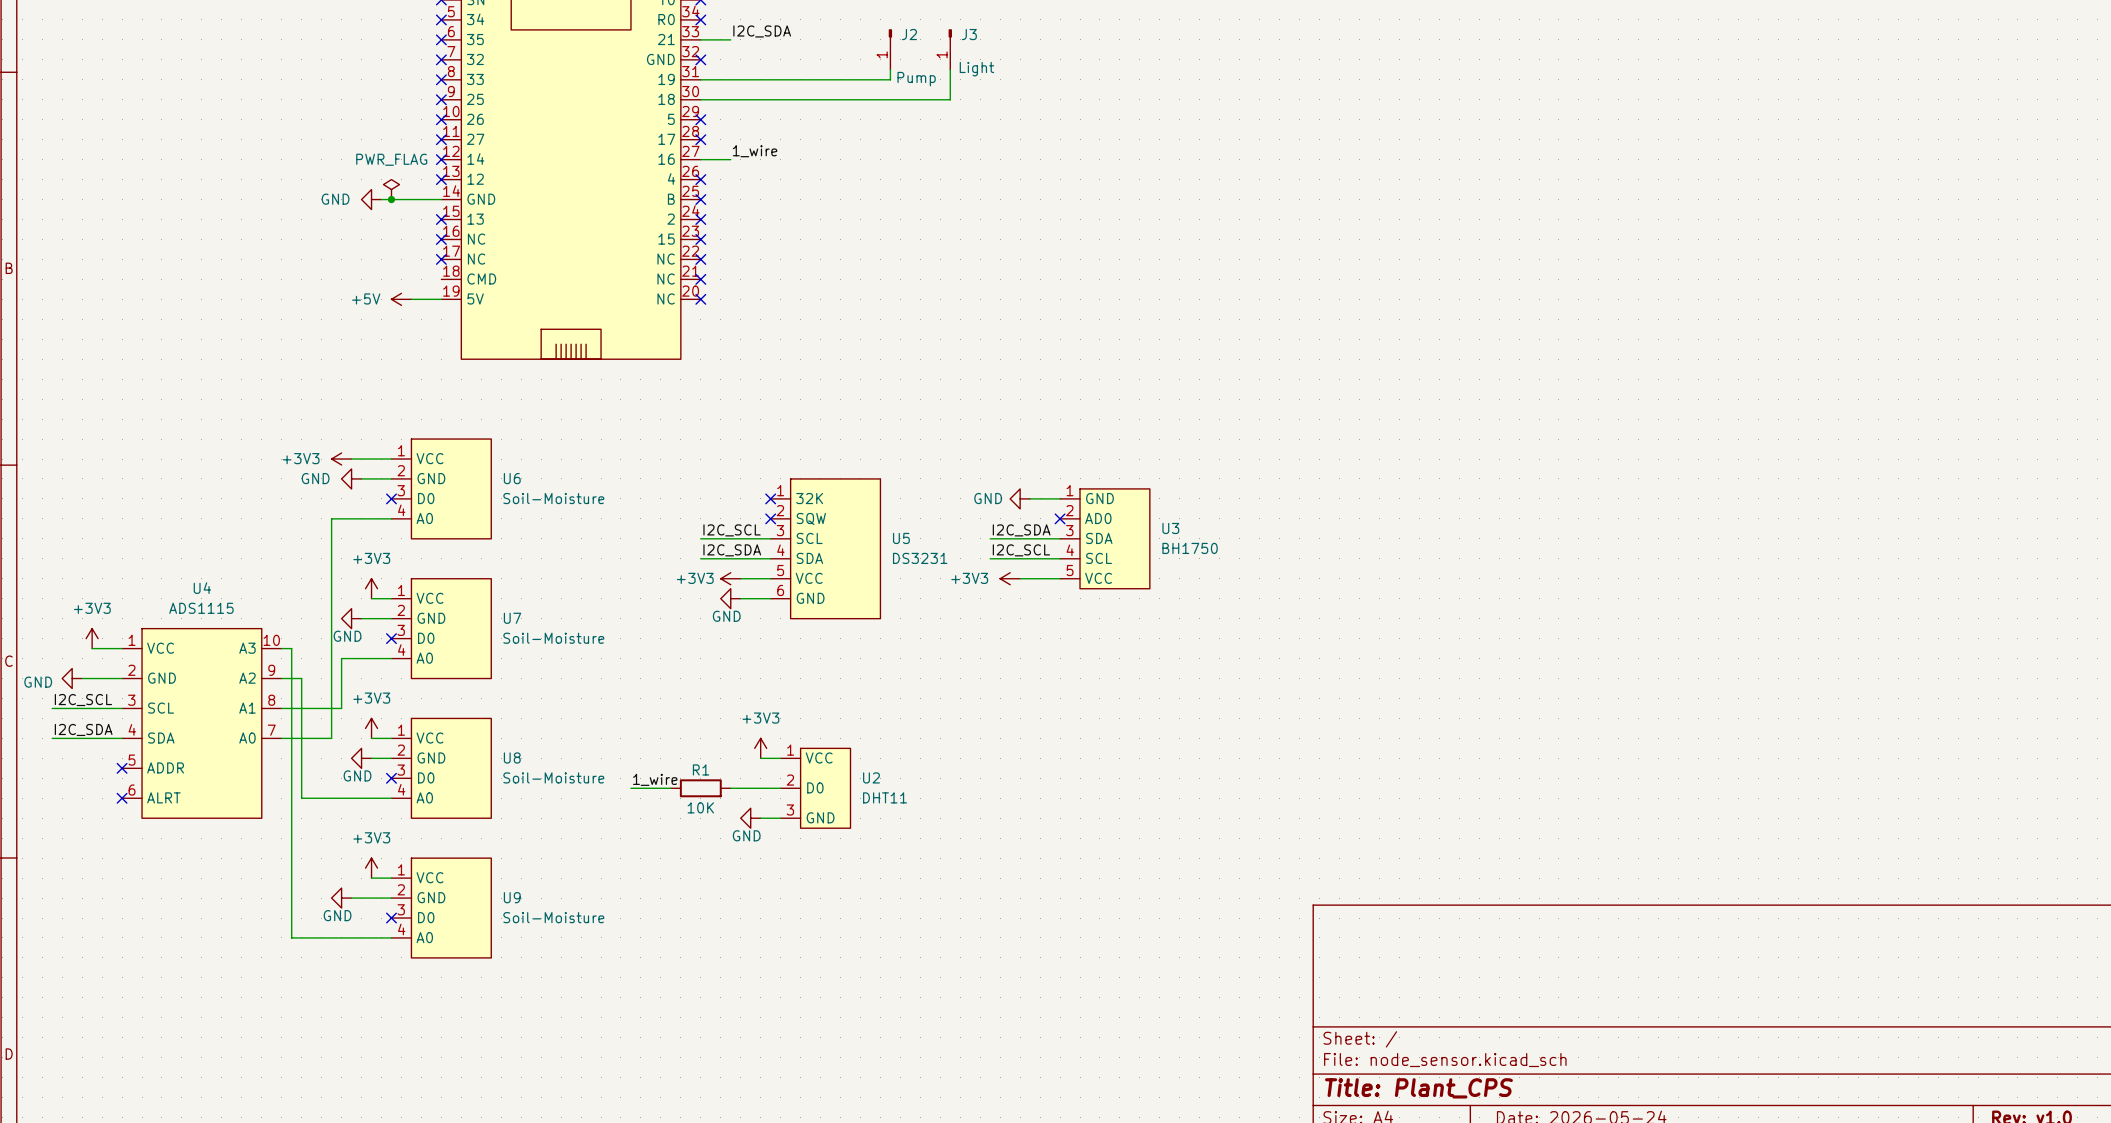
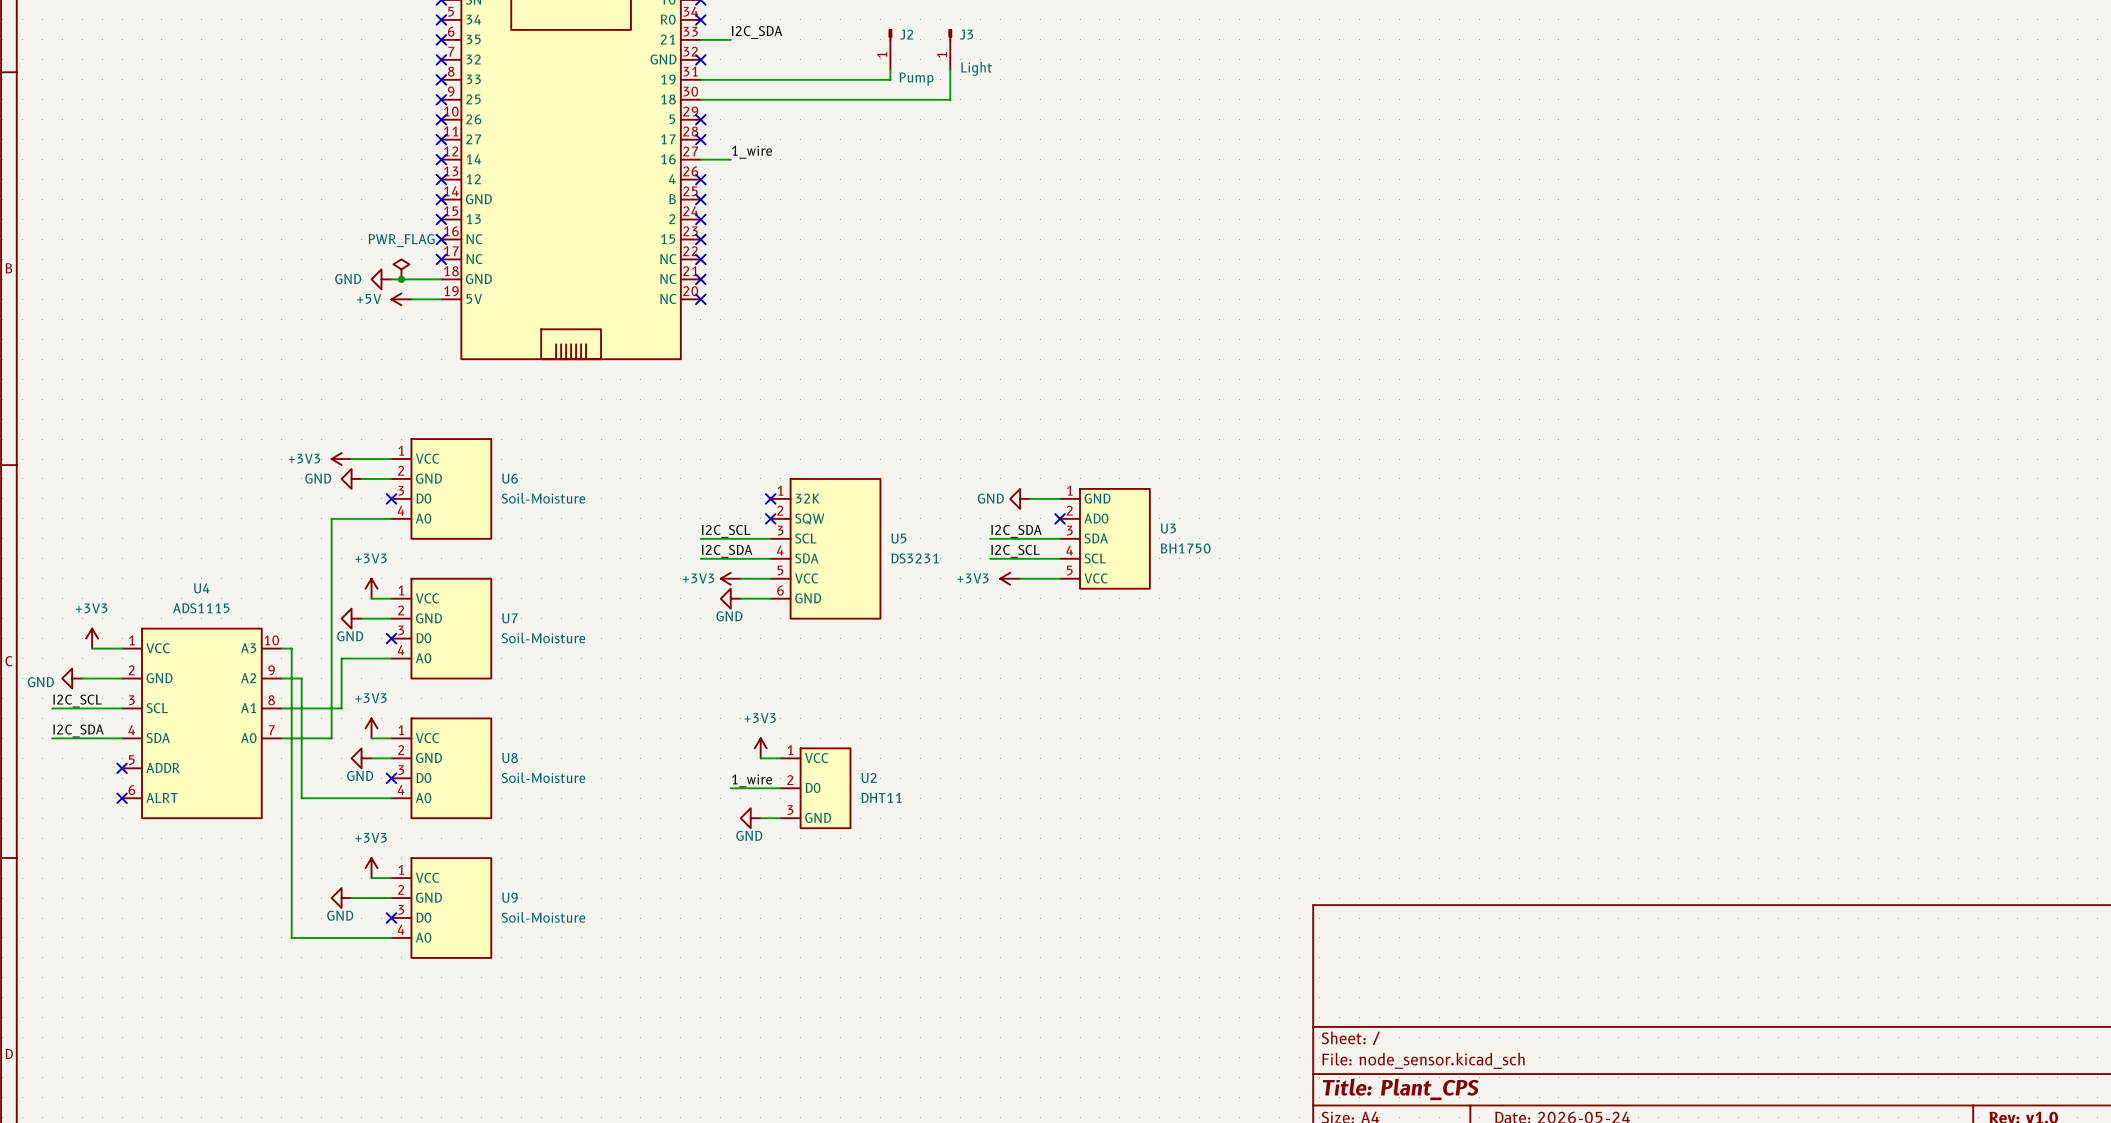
power symbol position: PWR_FLAG (391, 189) -> PWR_FLAG (401, 269)
power symbol position: GND (371, 199) -> GND (381, 279)
wire: (381, 199) (441, 199) -> none
junction: (391, 199) -> none
no-connect mark: none -> (441, 199)
wire: none -> (391, 279) (441, 279)
junction: none -> (401, 279)
part pin name: CMD (481, 279) -> GND (478, 279)
label position: 1_wire (655, 779) -> 1_wire (752, 780)
wire: (630, 788) (670, 788) -> none
R1: 10K (700, 788) -> none

